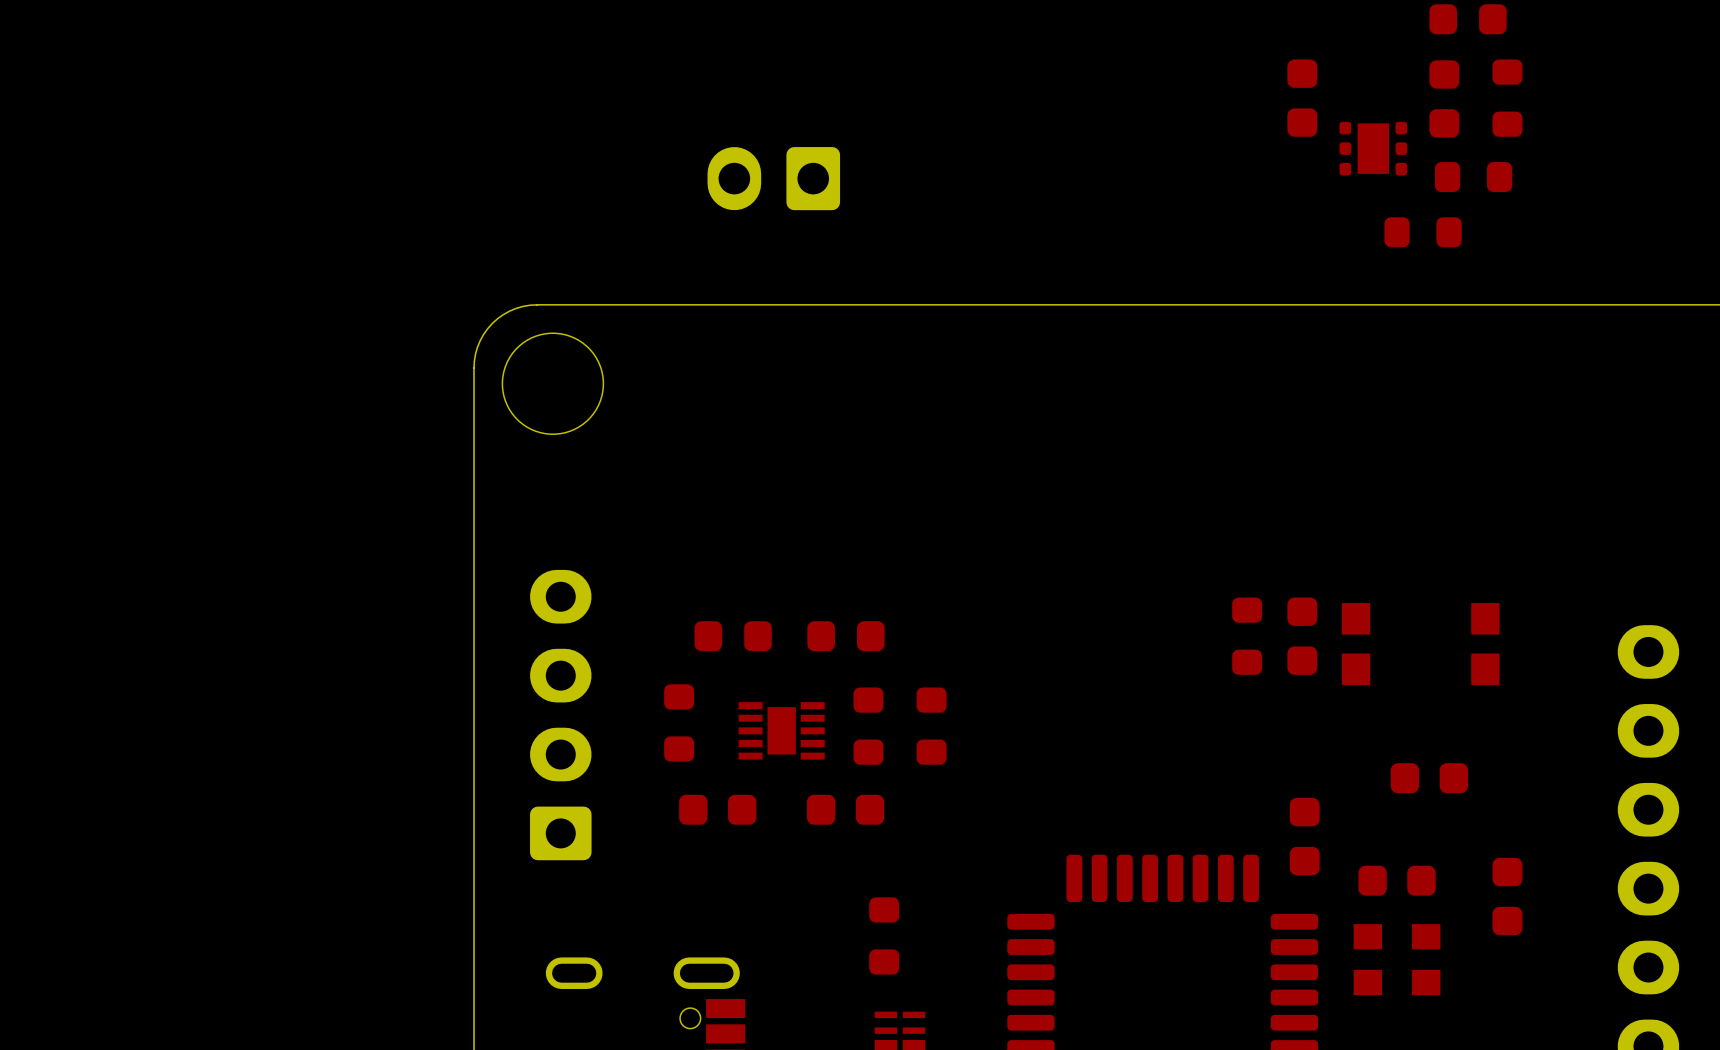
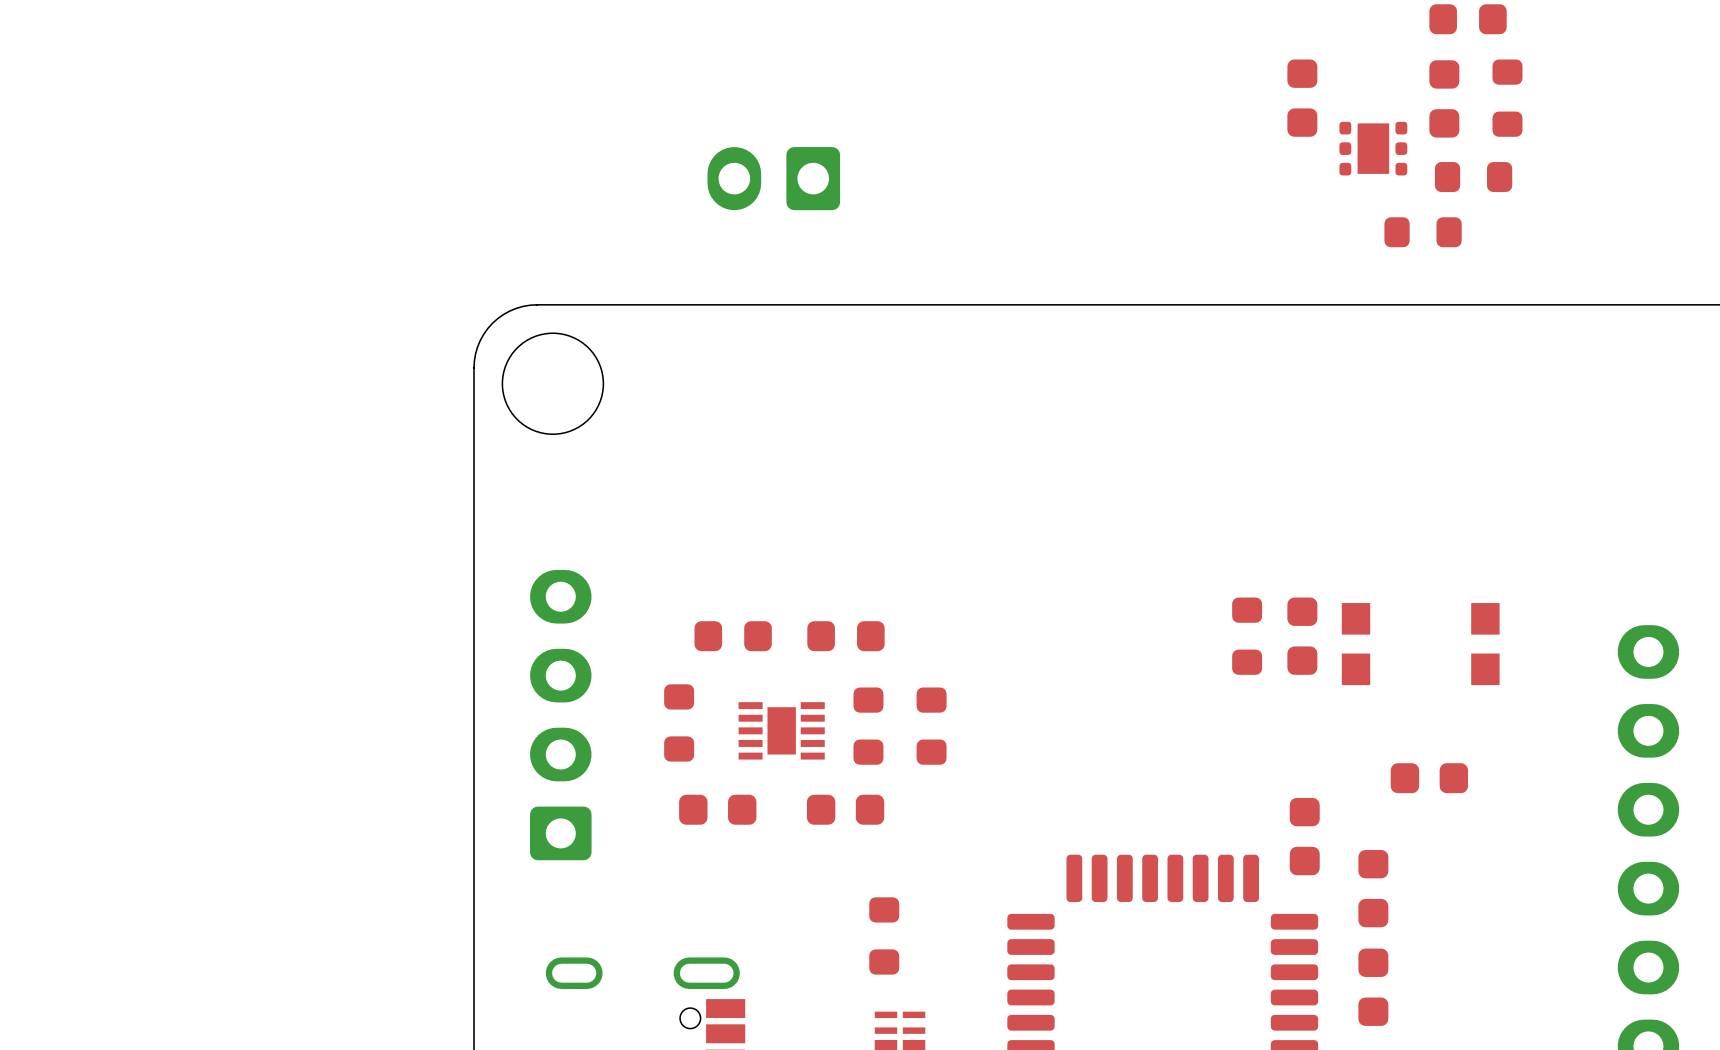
part rotation: 0° (1397, 880) -> 90° clockwise (1373, 888)
part position: (1507, 896) -> (1373, 987)
part: (1397, 959) -> none

